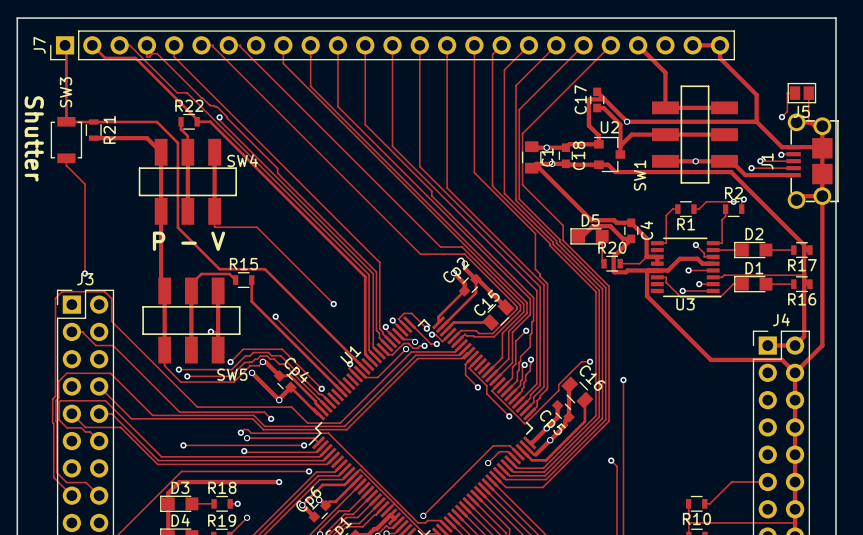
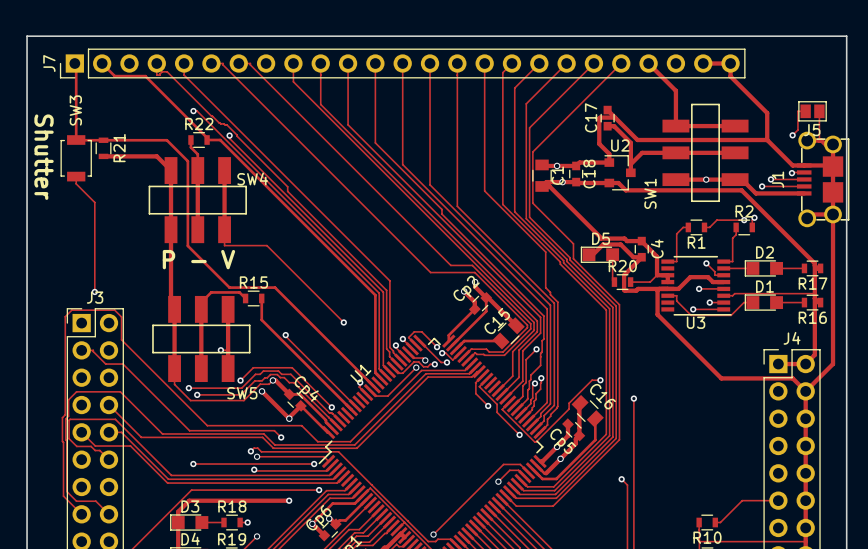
track: (119, 45) (129, 45) (177, 92) (183, 92) -> none
via: none -> (193, 111)
via: (627, 121) -> none

